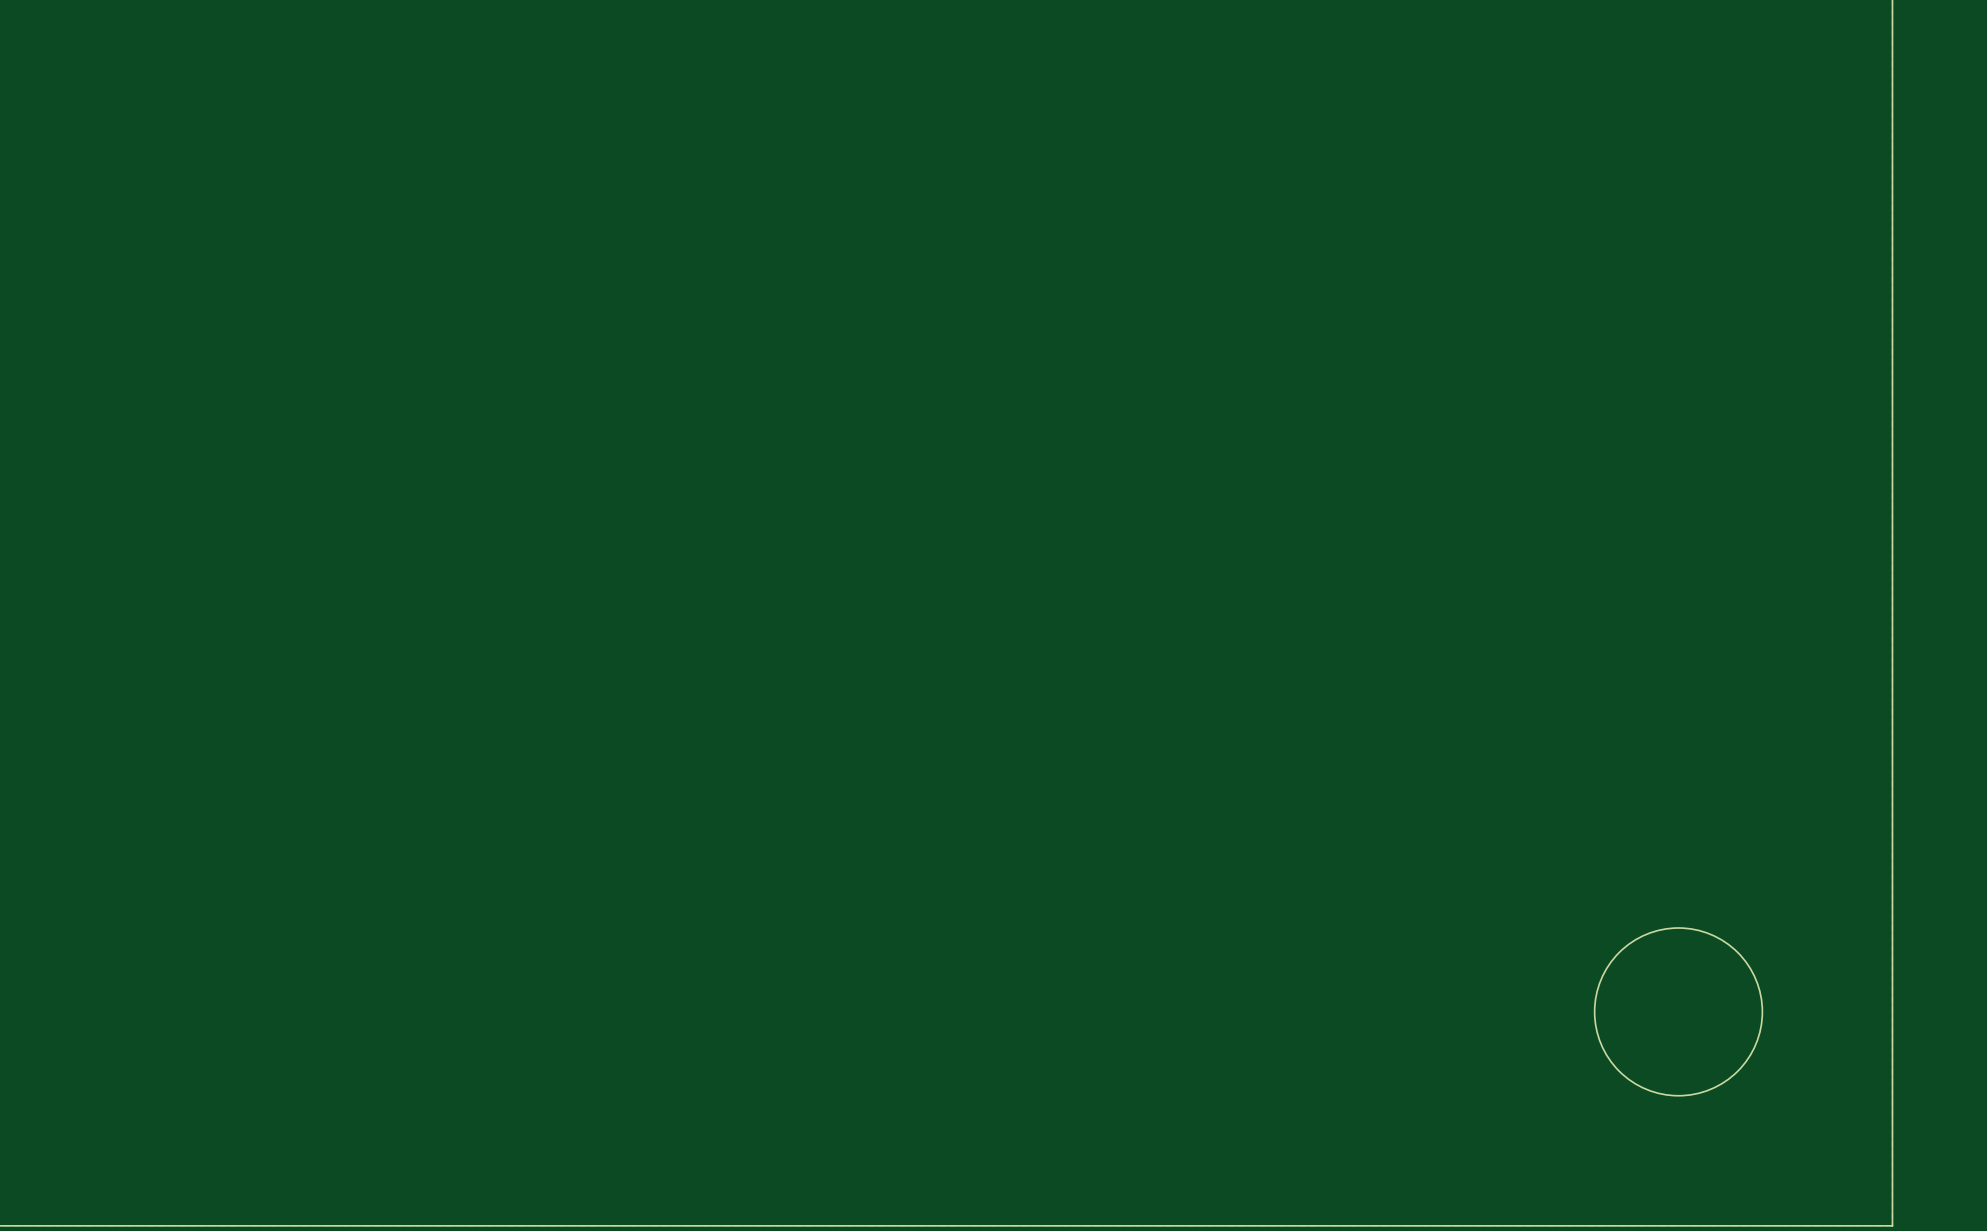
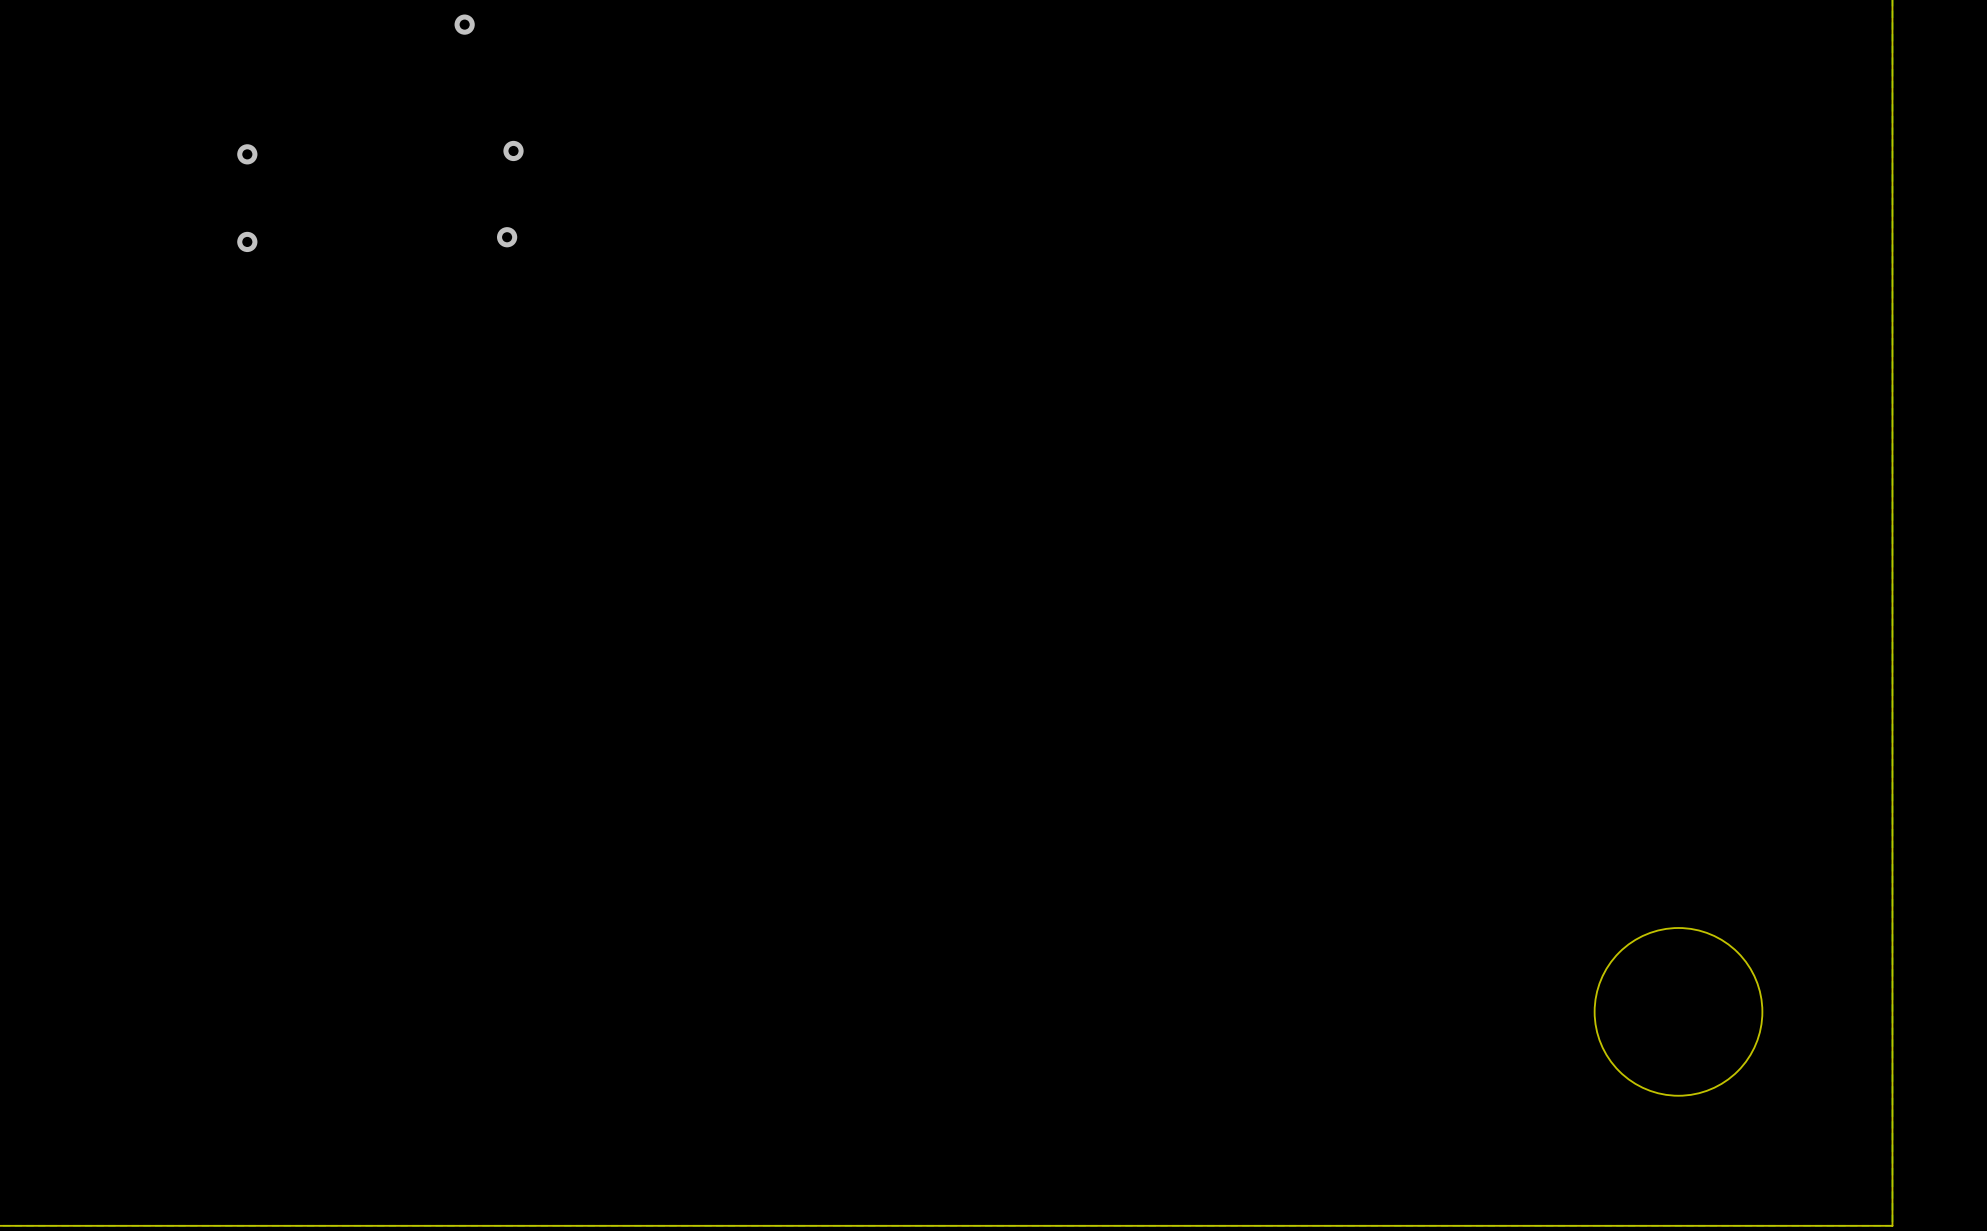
via: none -> (464, 24)
via: none -> (513, 150)
via: none -> (247, 154)
via: none -> (507, 237)
via: none -> (247, 241)

